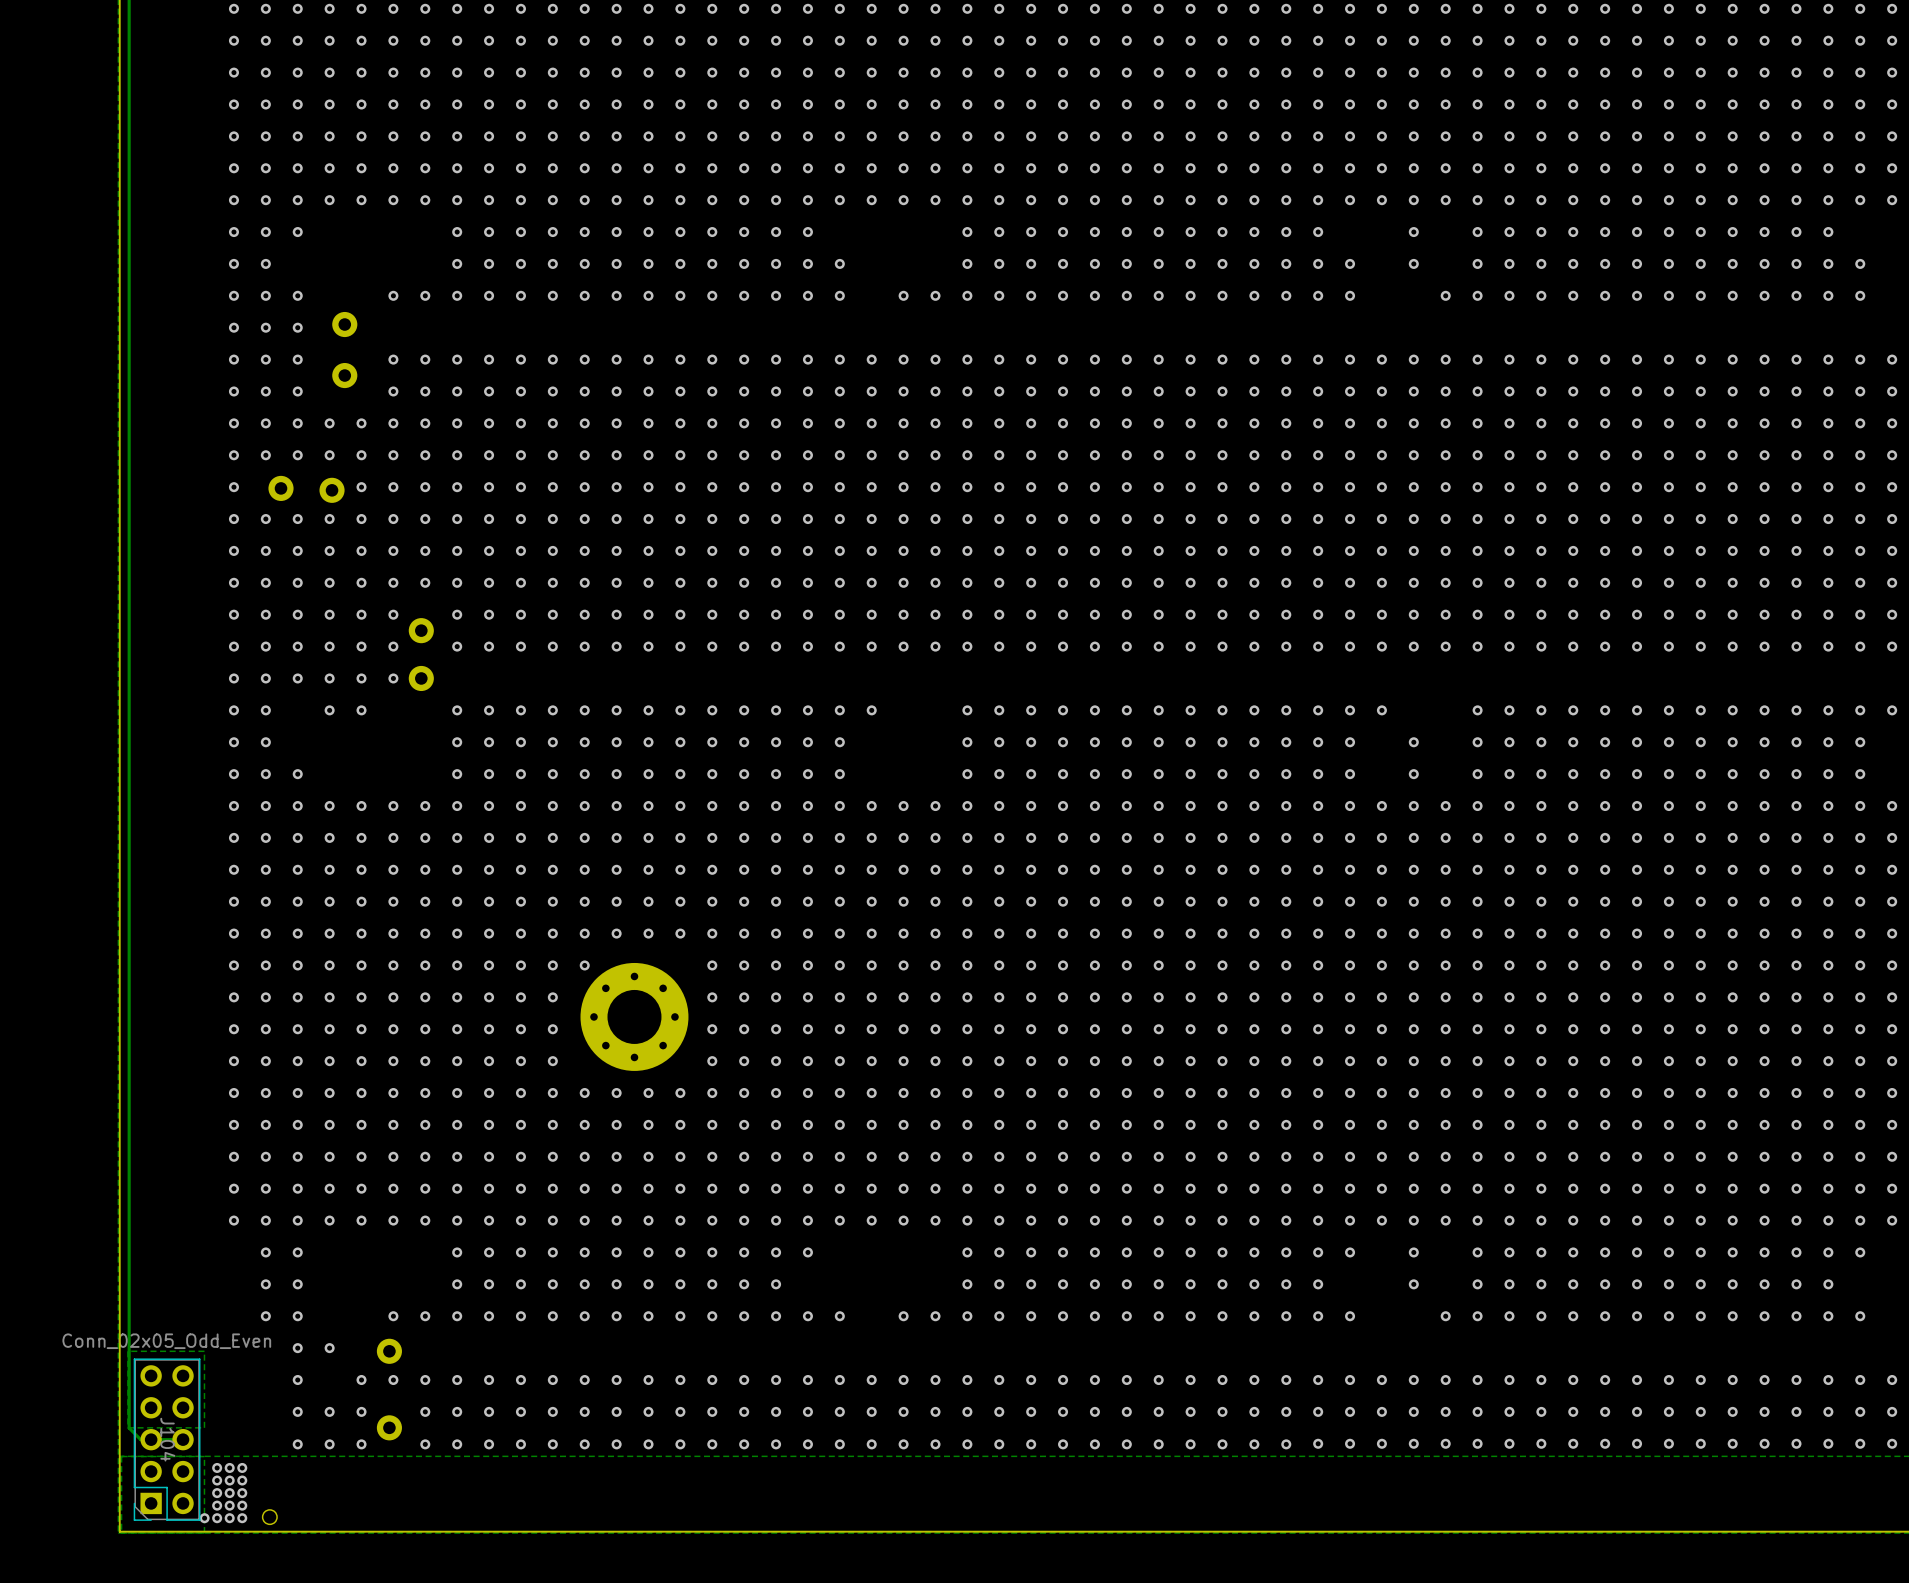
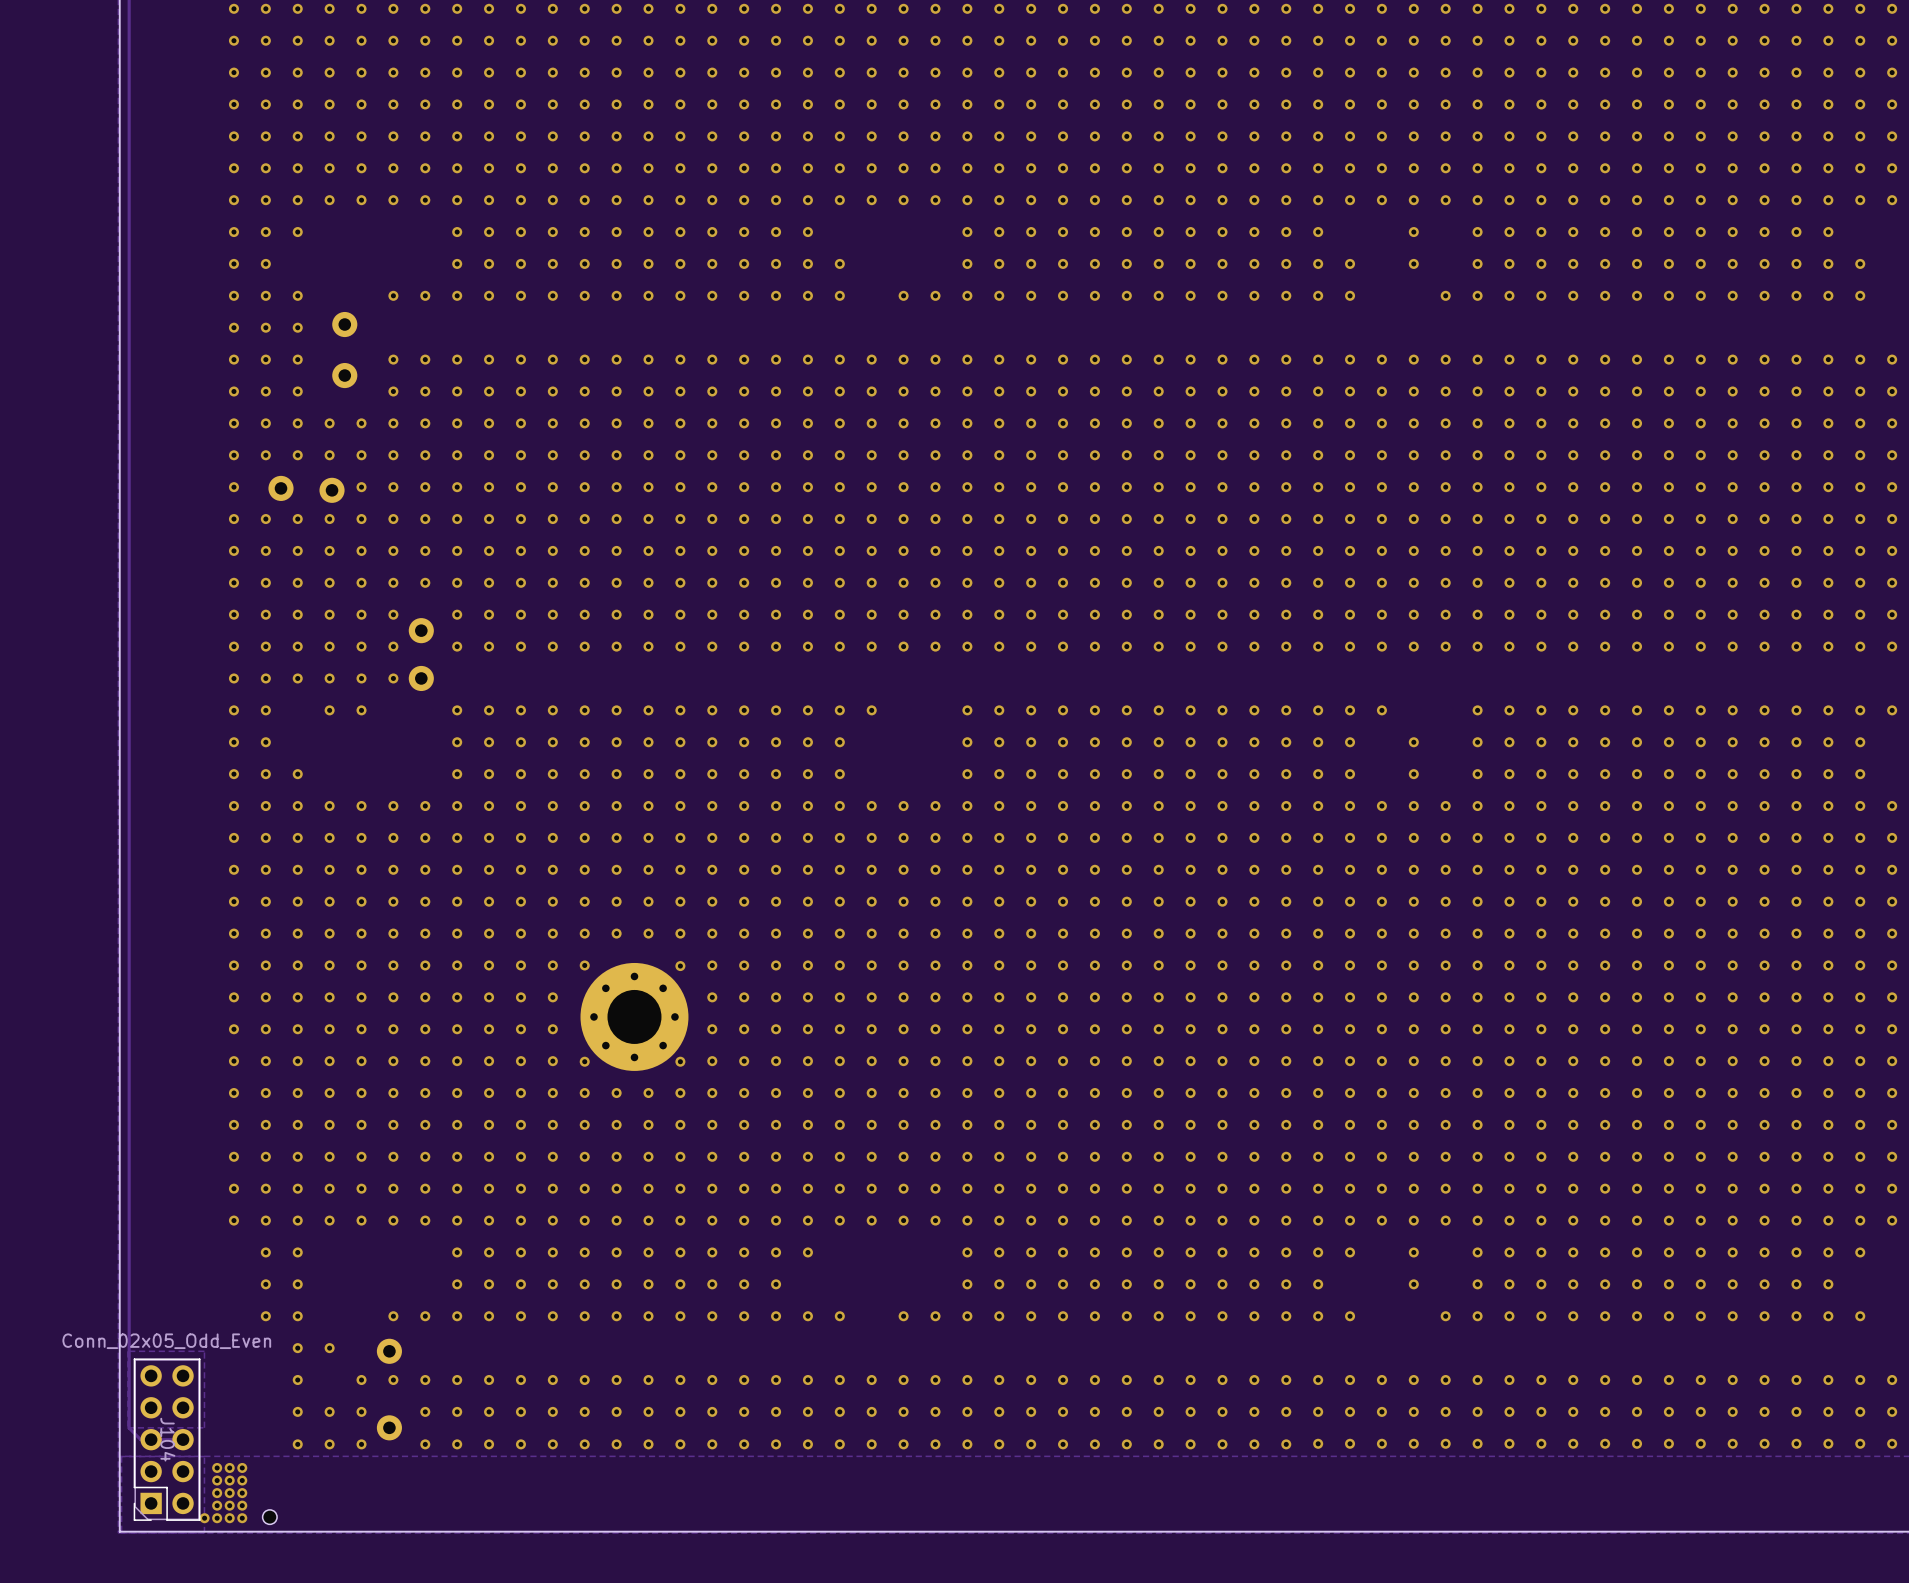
via: none -> (680, 966)
via: none -> (584, 1061)
via: none -> (680, 1061)

